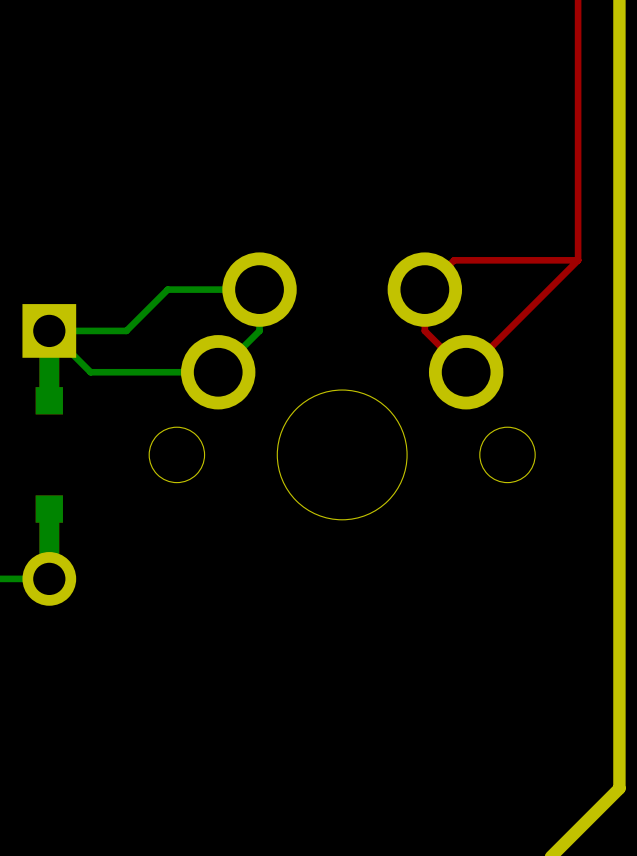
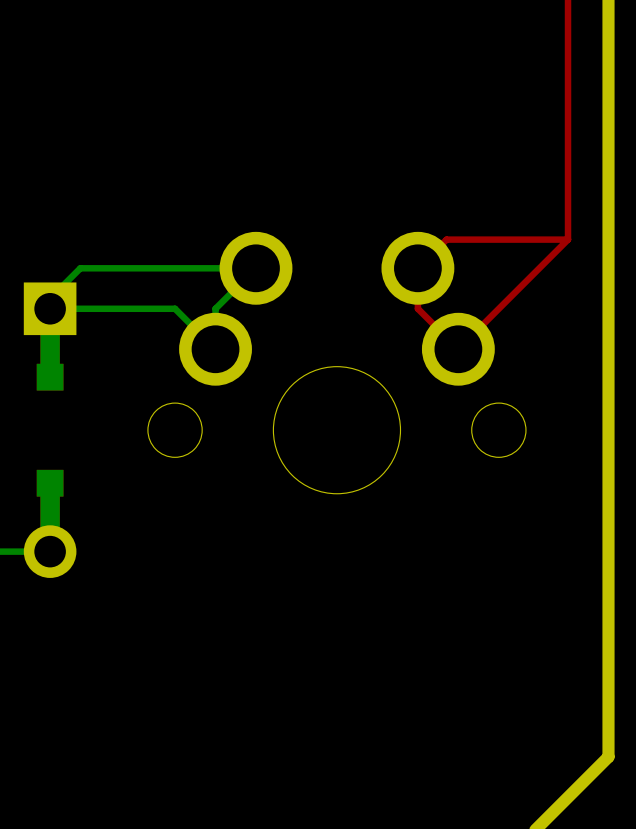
bottom track: (167, 289) (126, 330) -> (166, 268) (80, 268) (50, 298) (50, 308)
bottom track: (259, 289) (259, 330) (218, 372) (90, 372) (49, 330) -> (256, 268) (215, 308) (215, 349) (175, 308) (125, 308)

